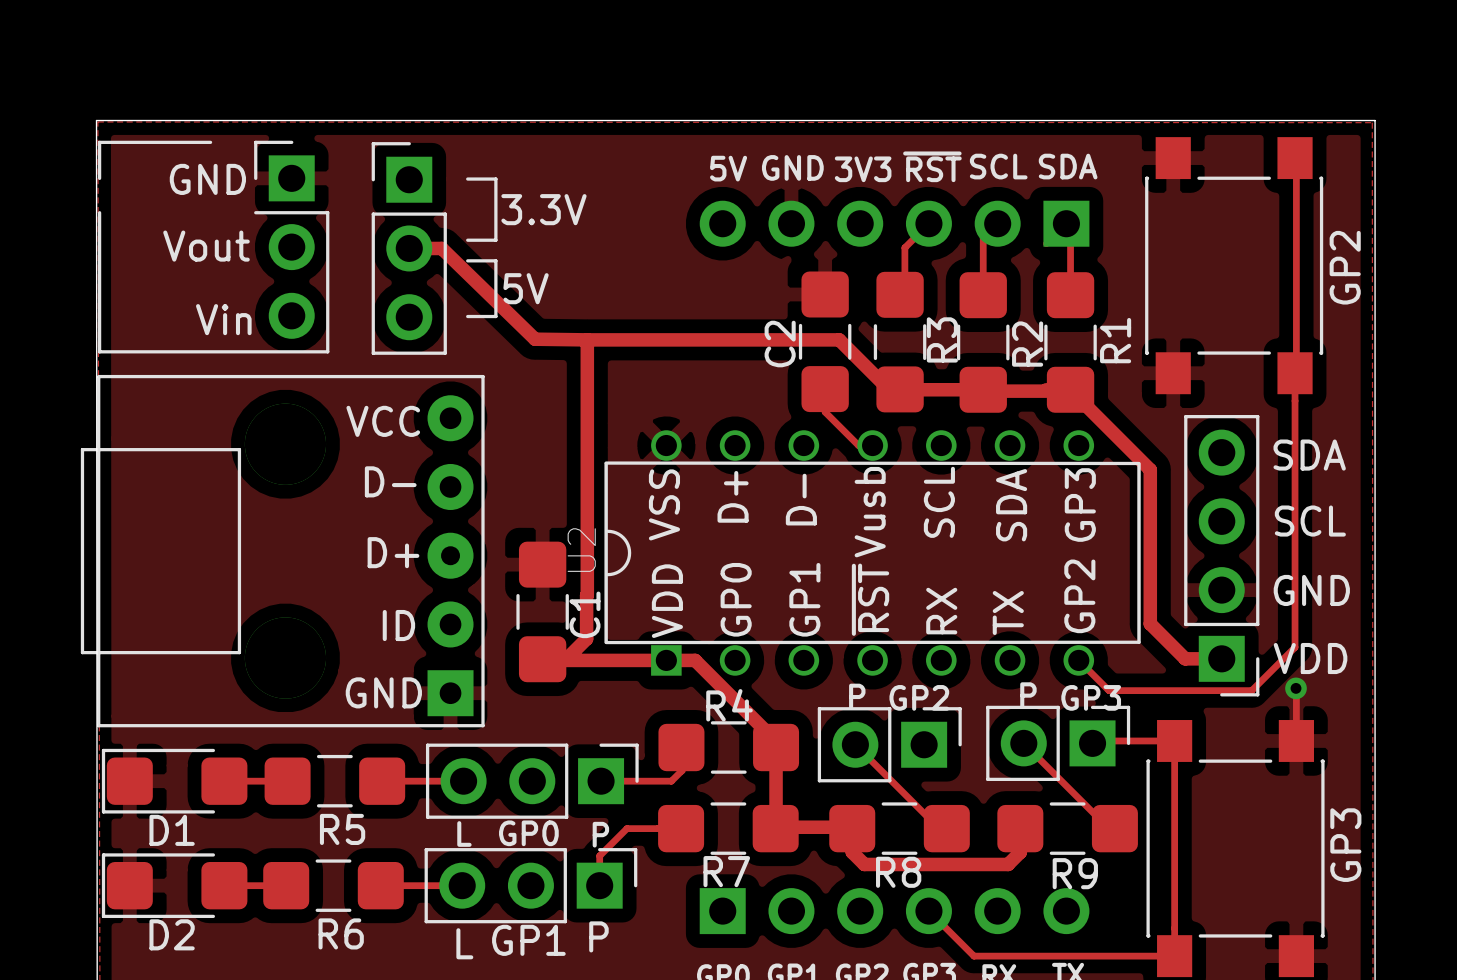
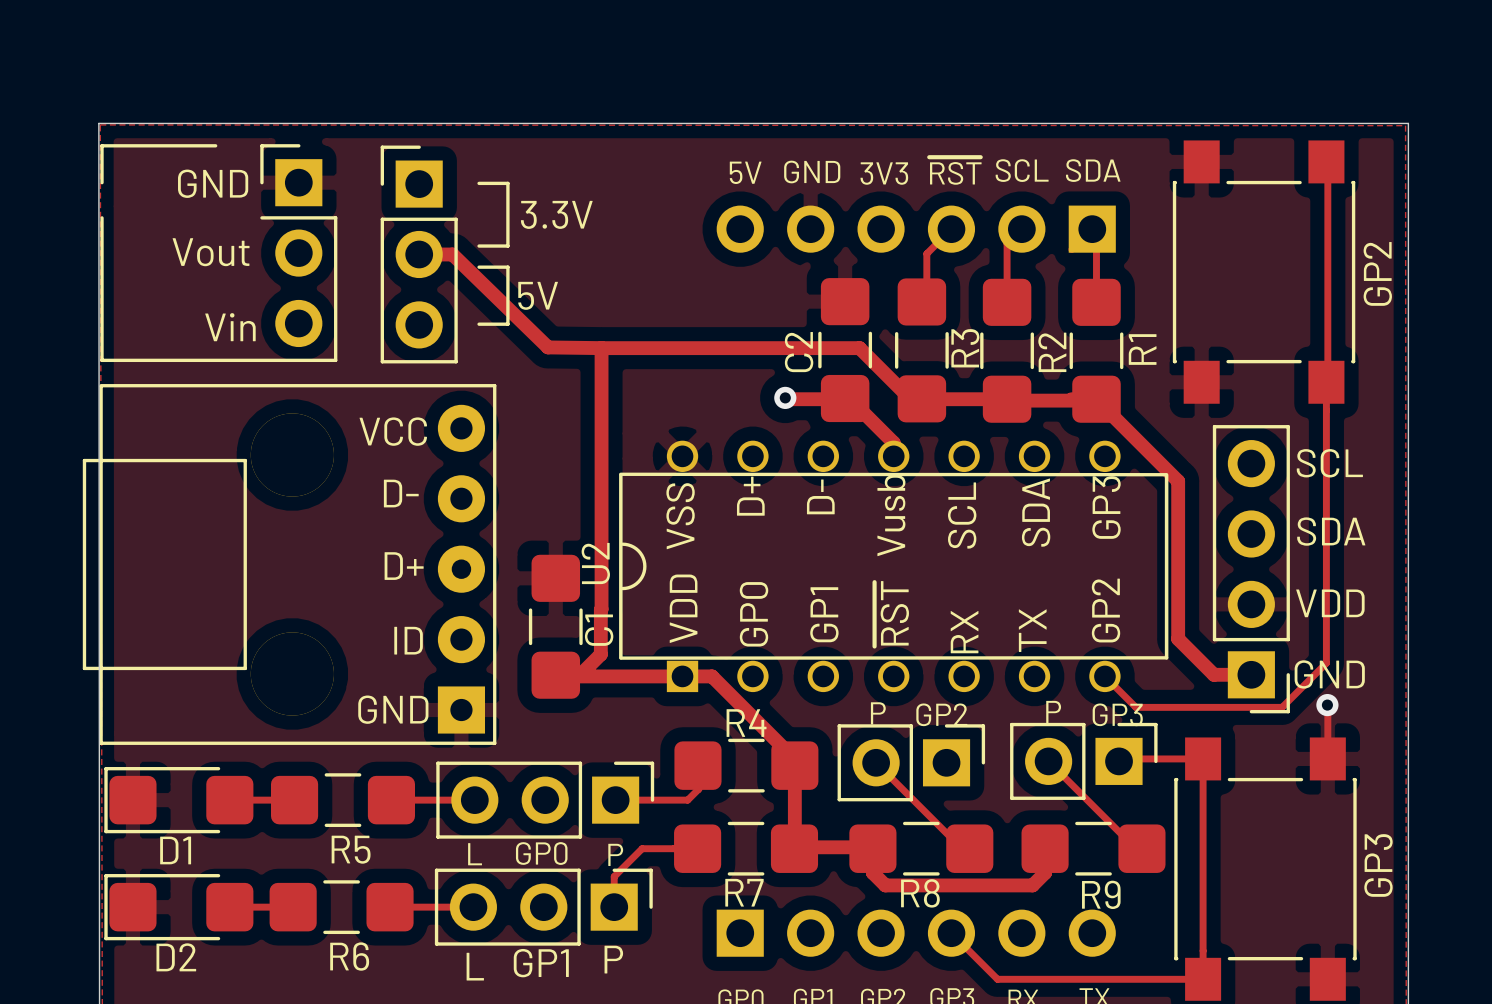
via: none -> (785, 397)
track: (825, 389) (825, 412) (858, 445) (872, 445) -> (786, 399) (850, 399) (893, 442) (893, 456)
text: SDA (1309, 455) -> SCL (1329, 463)
text: SCL (1310, 521) -> SDA (1331, 531)
text: GND (1311, 590) -> VDD (1330, 603)
text: VDD (1310, 658) -> GND (1329, 674)

